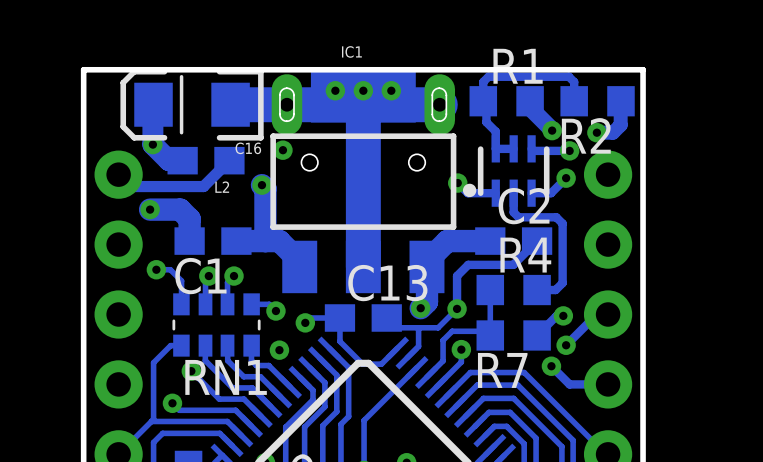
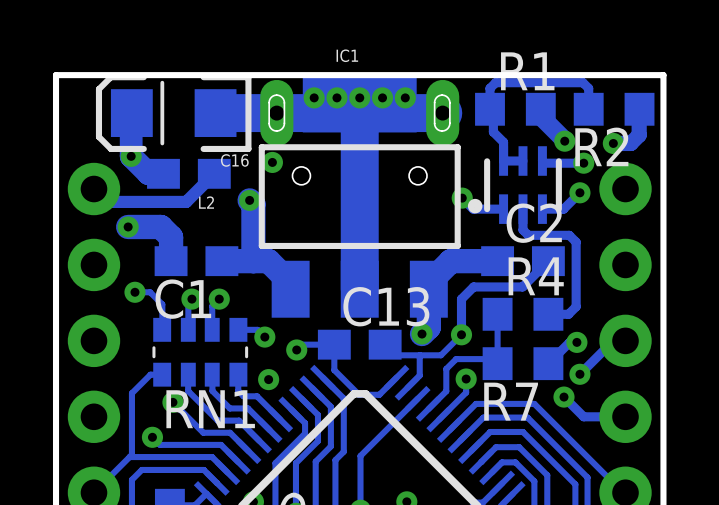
via: none -> (314, 97)
via: (335, 90) -> none
via: none -> (336, 97)
via: none -> (382, 97)
via: (391, 90) -> none
via: none -> (405, 97)

